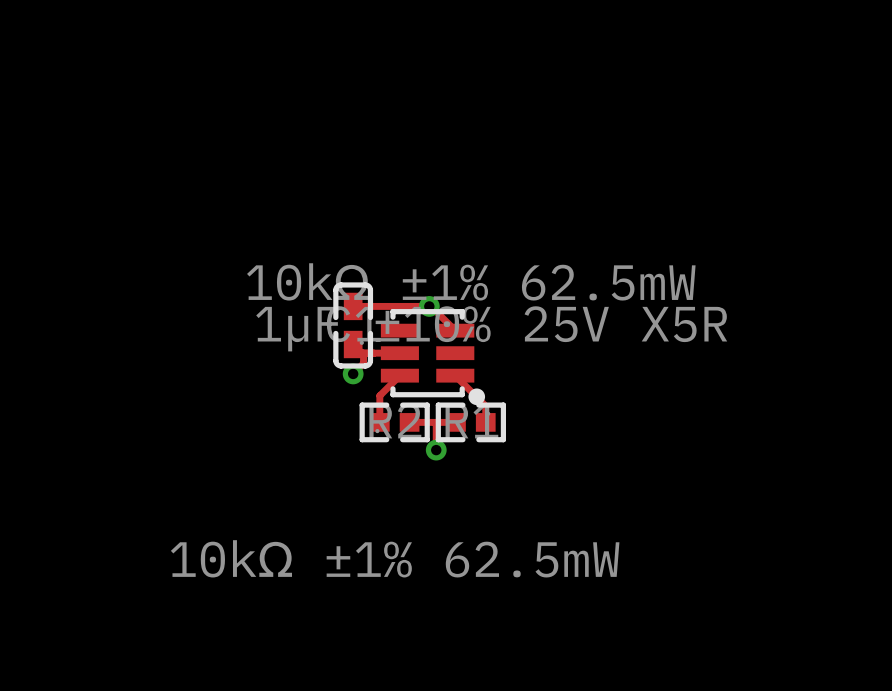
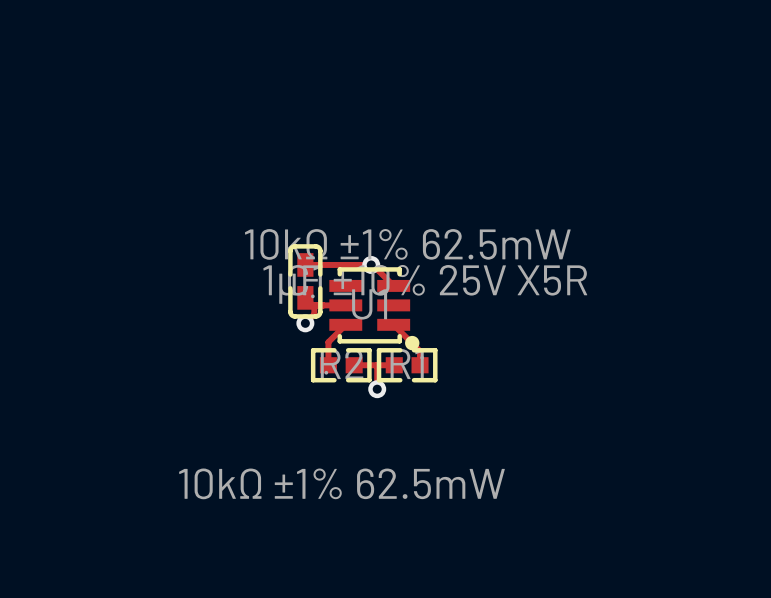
U1 name: none -> U1 (369, 304)

